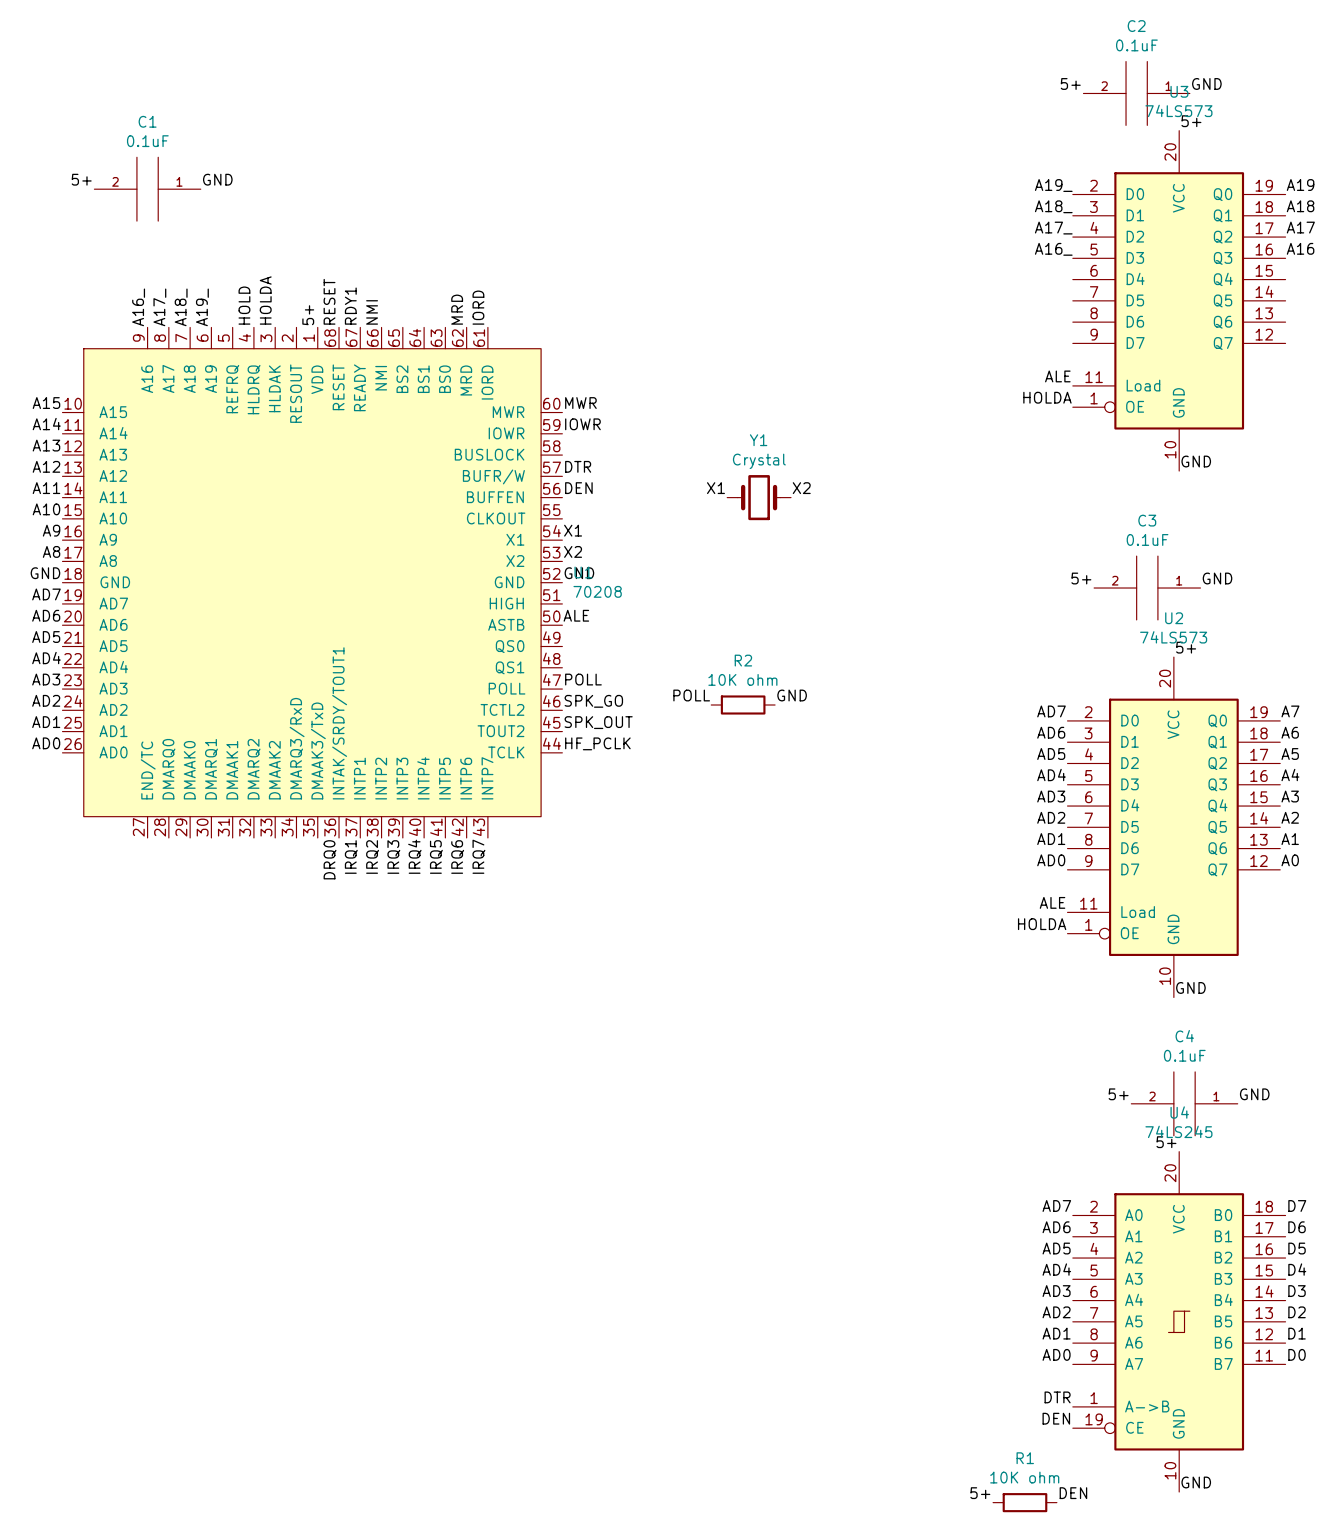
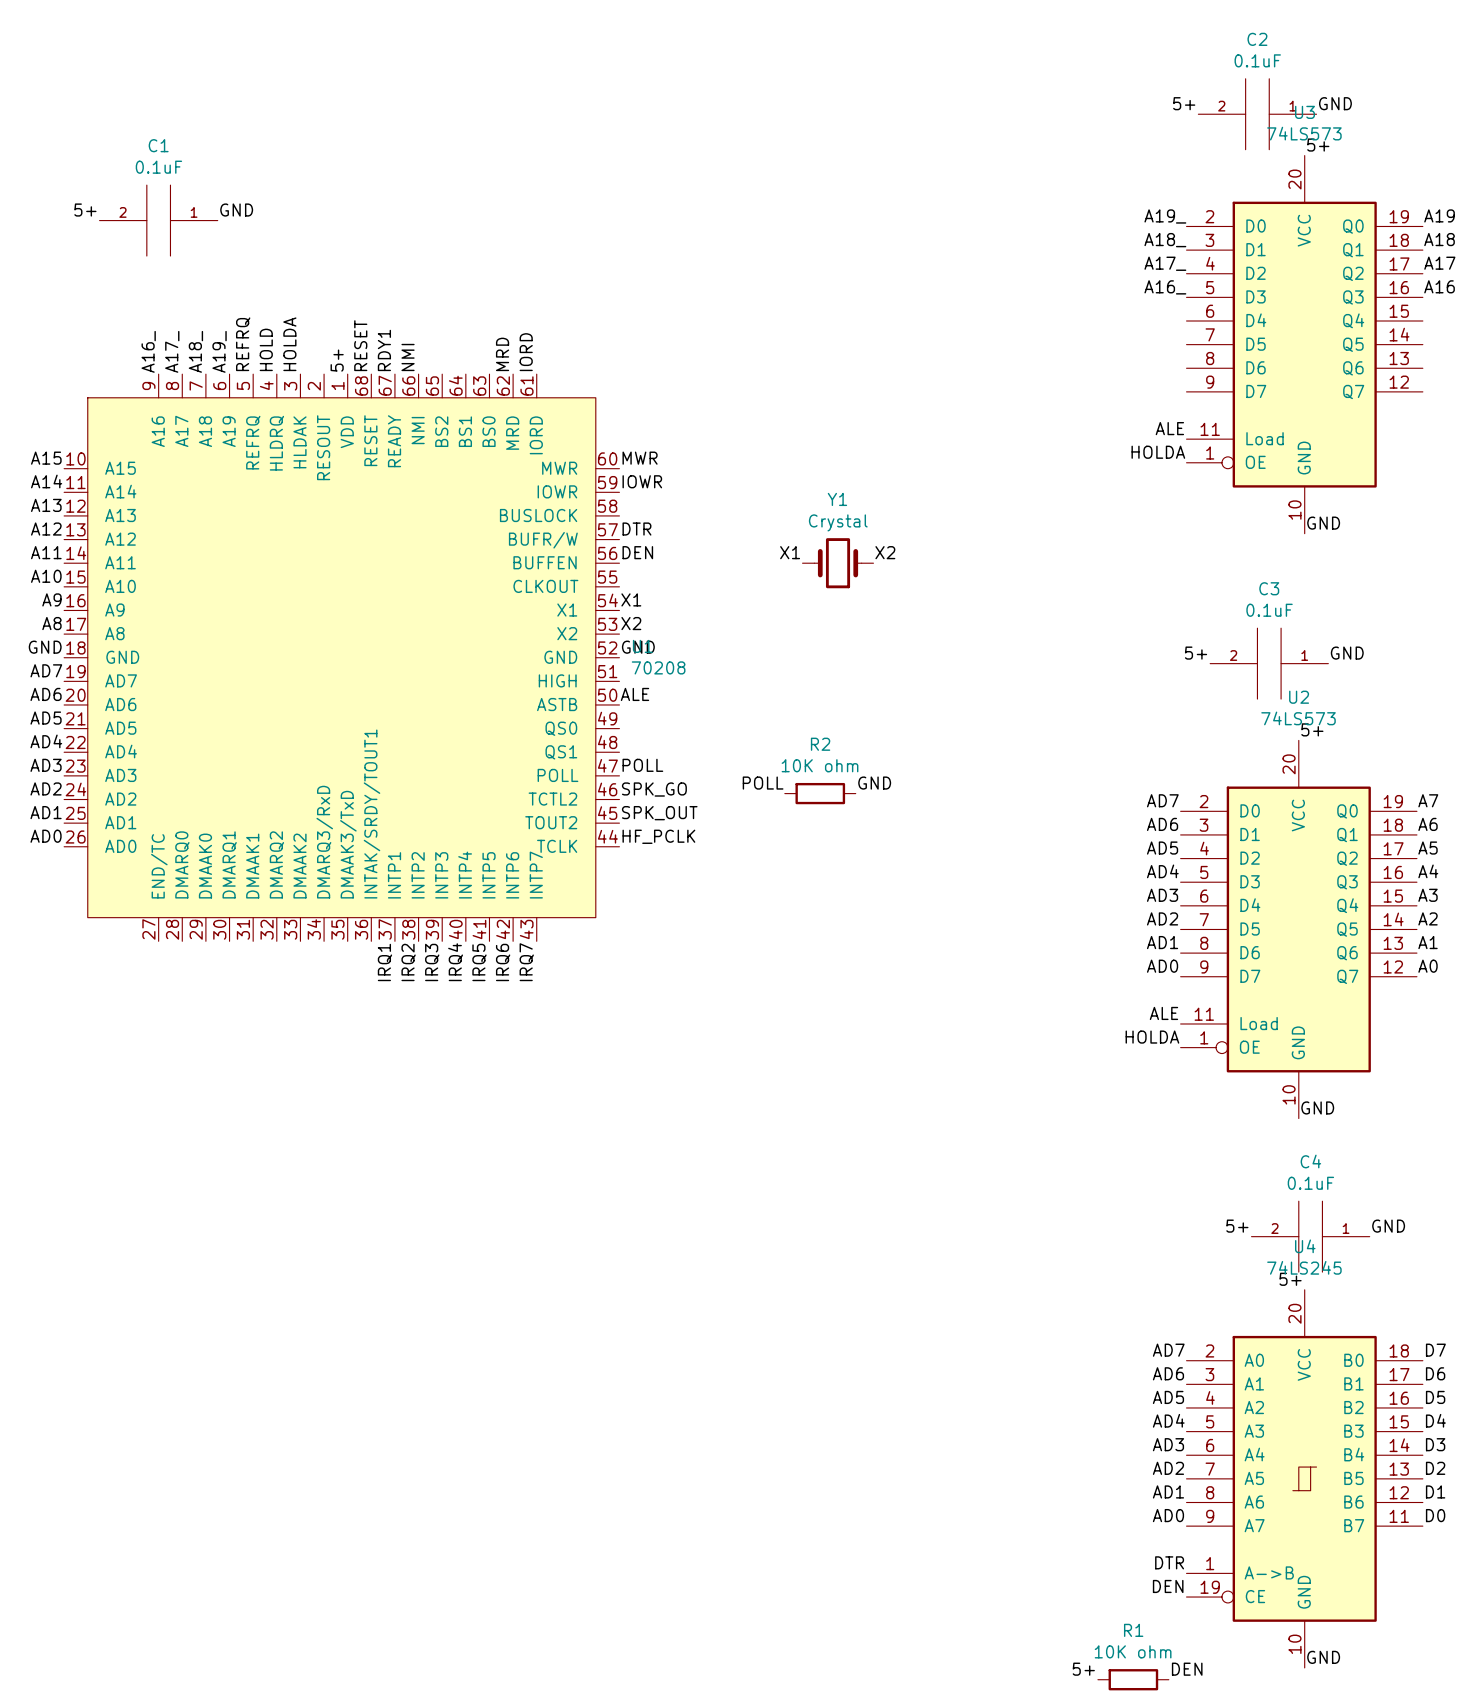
label: none -> REFRQ (243, 344)
label: DRQ0 (330, 859) -> none

